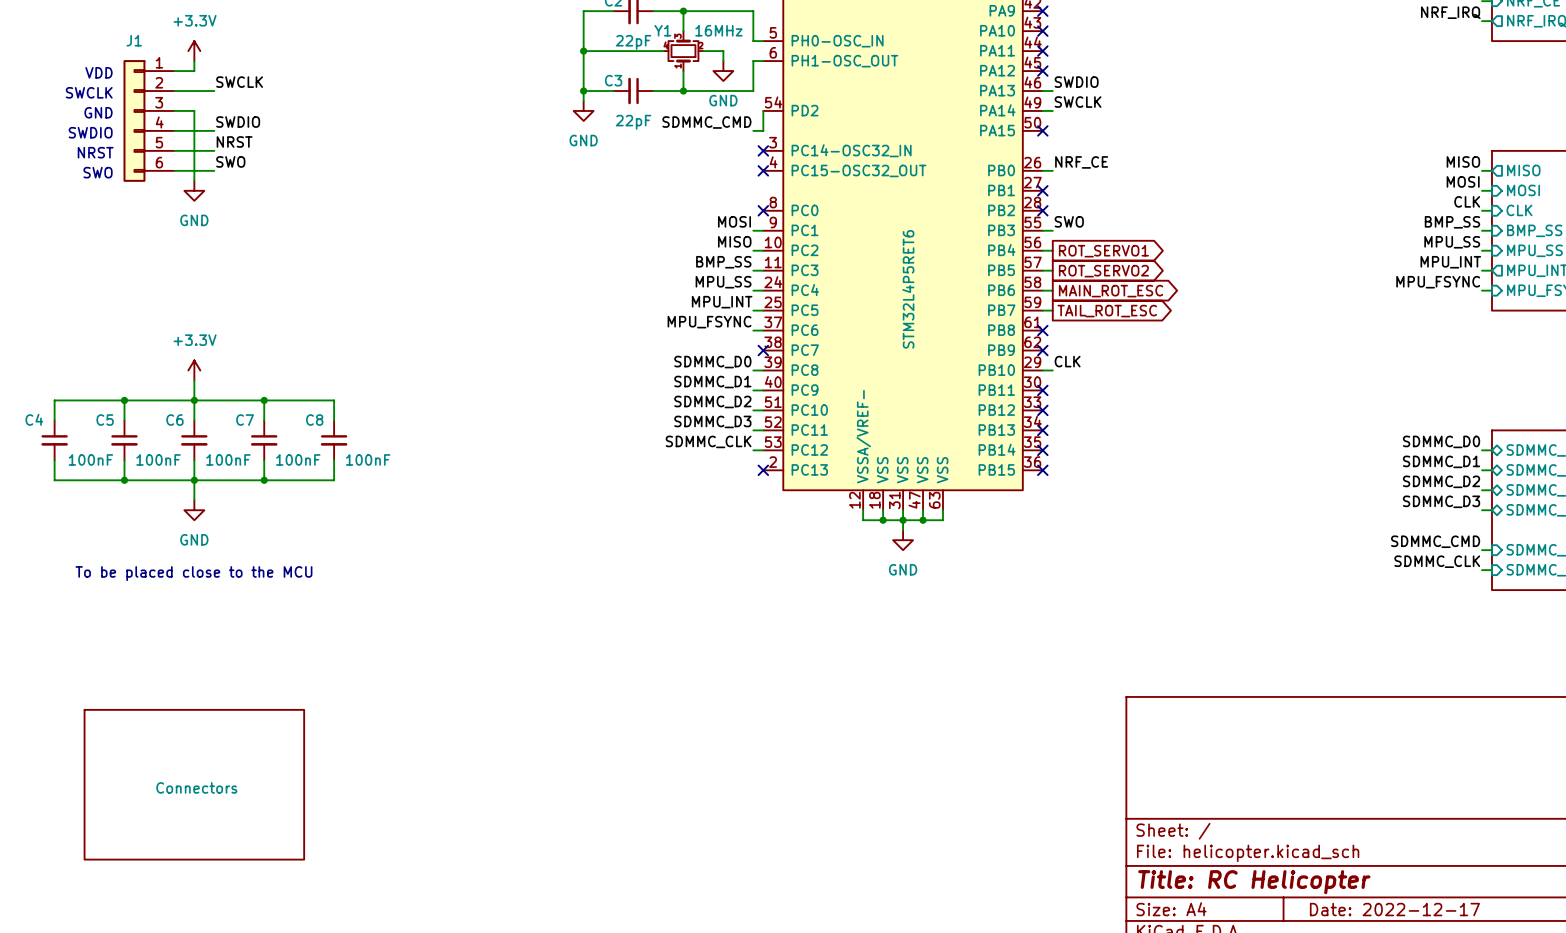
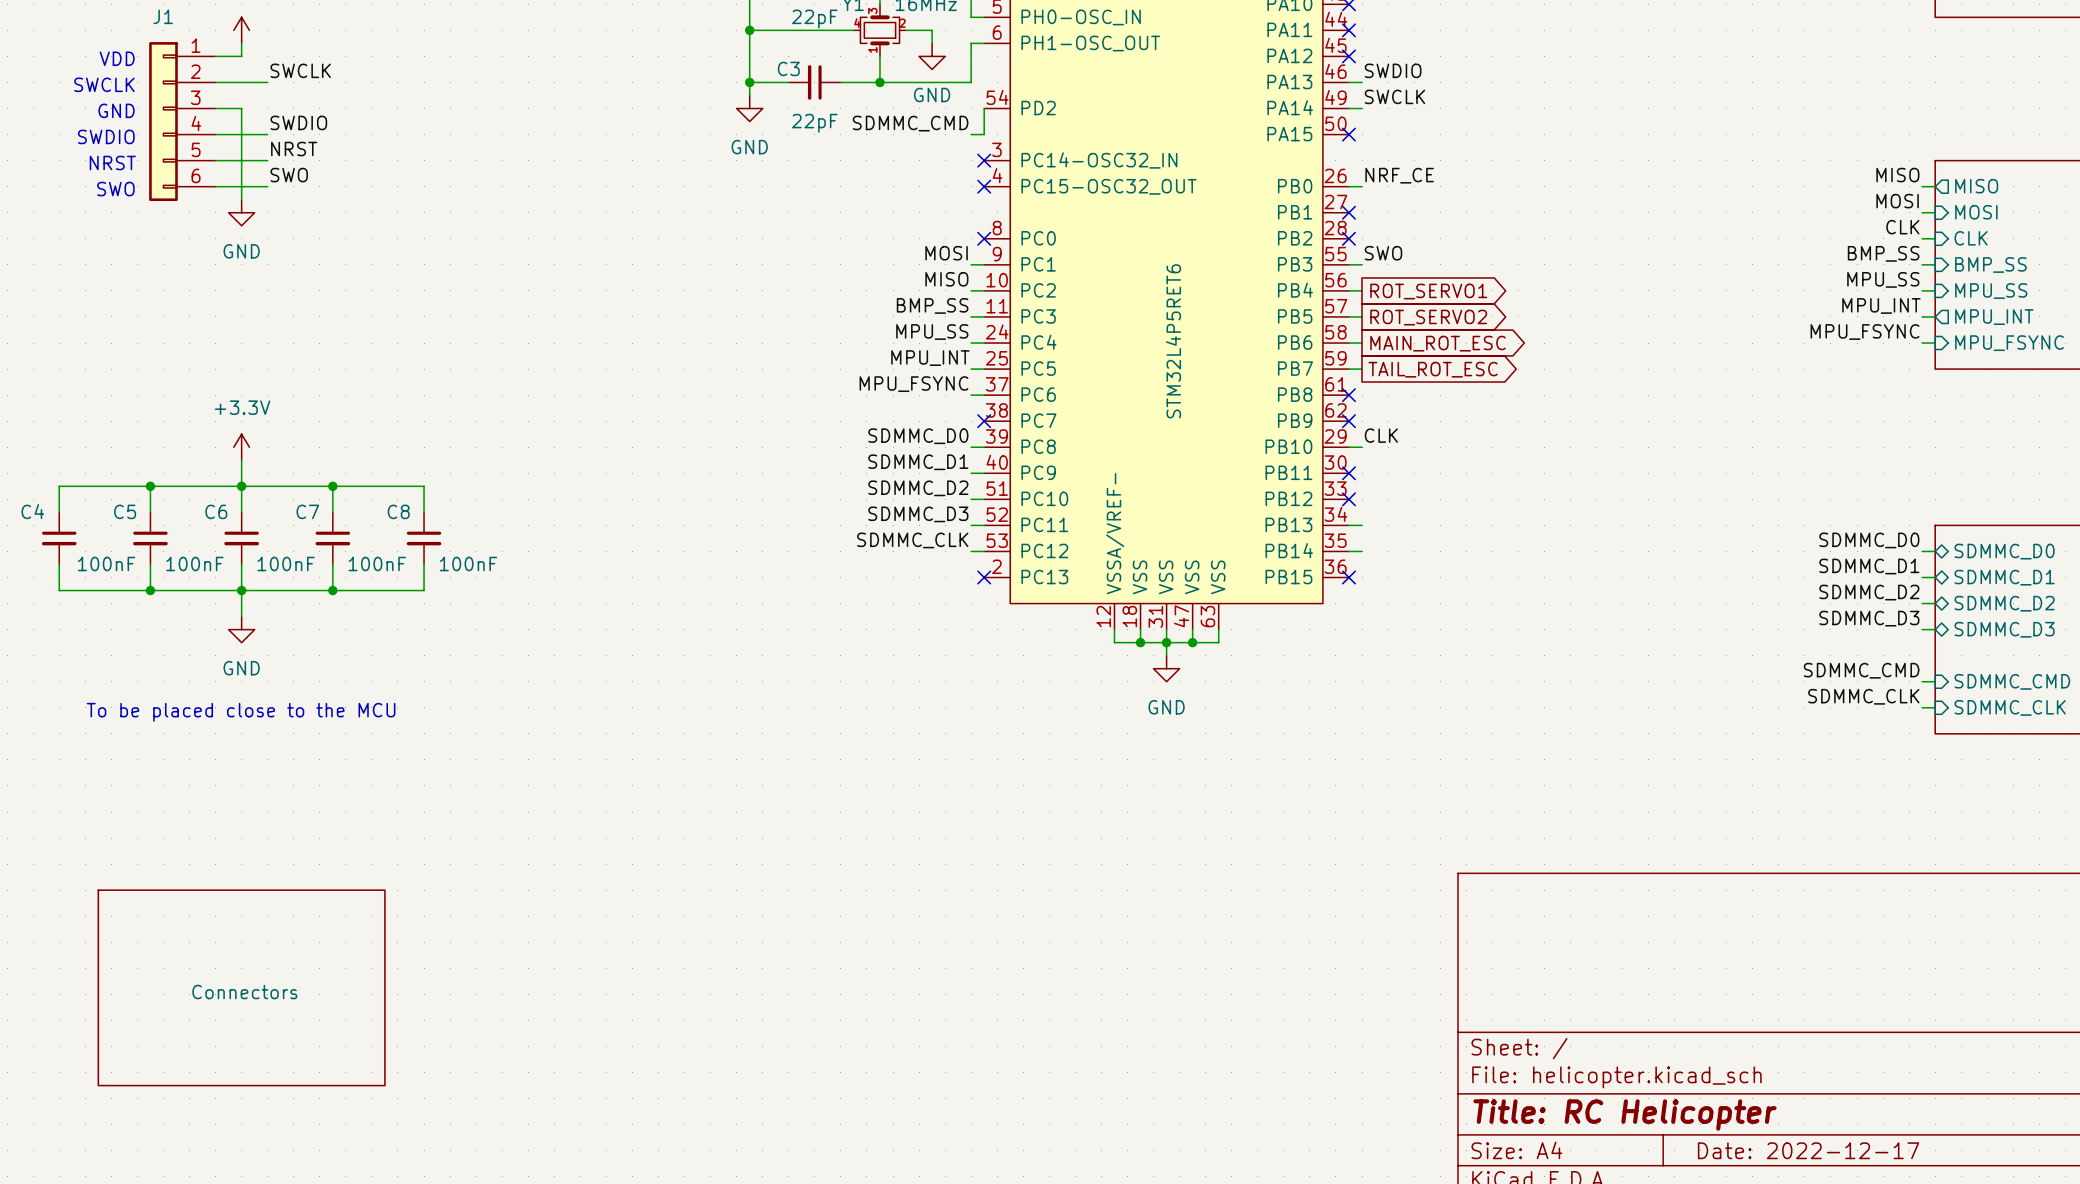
wire: none -> (1348, 525) (1362, 525)
no-connect mark: (1042, 430) -> none
wire: none -> (1348, 551) (1362, 551)
no-connect mark: (1042, 450) -> none

